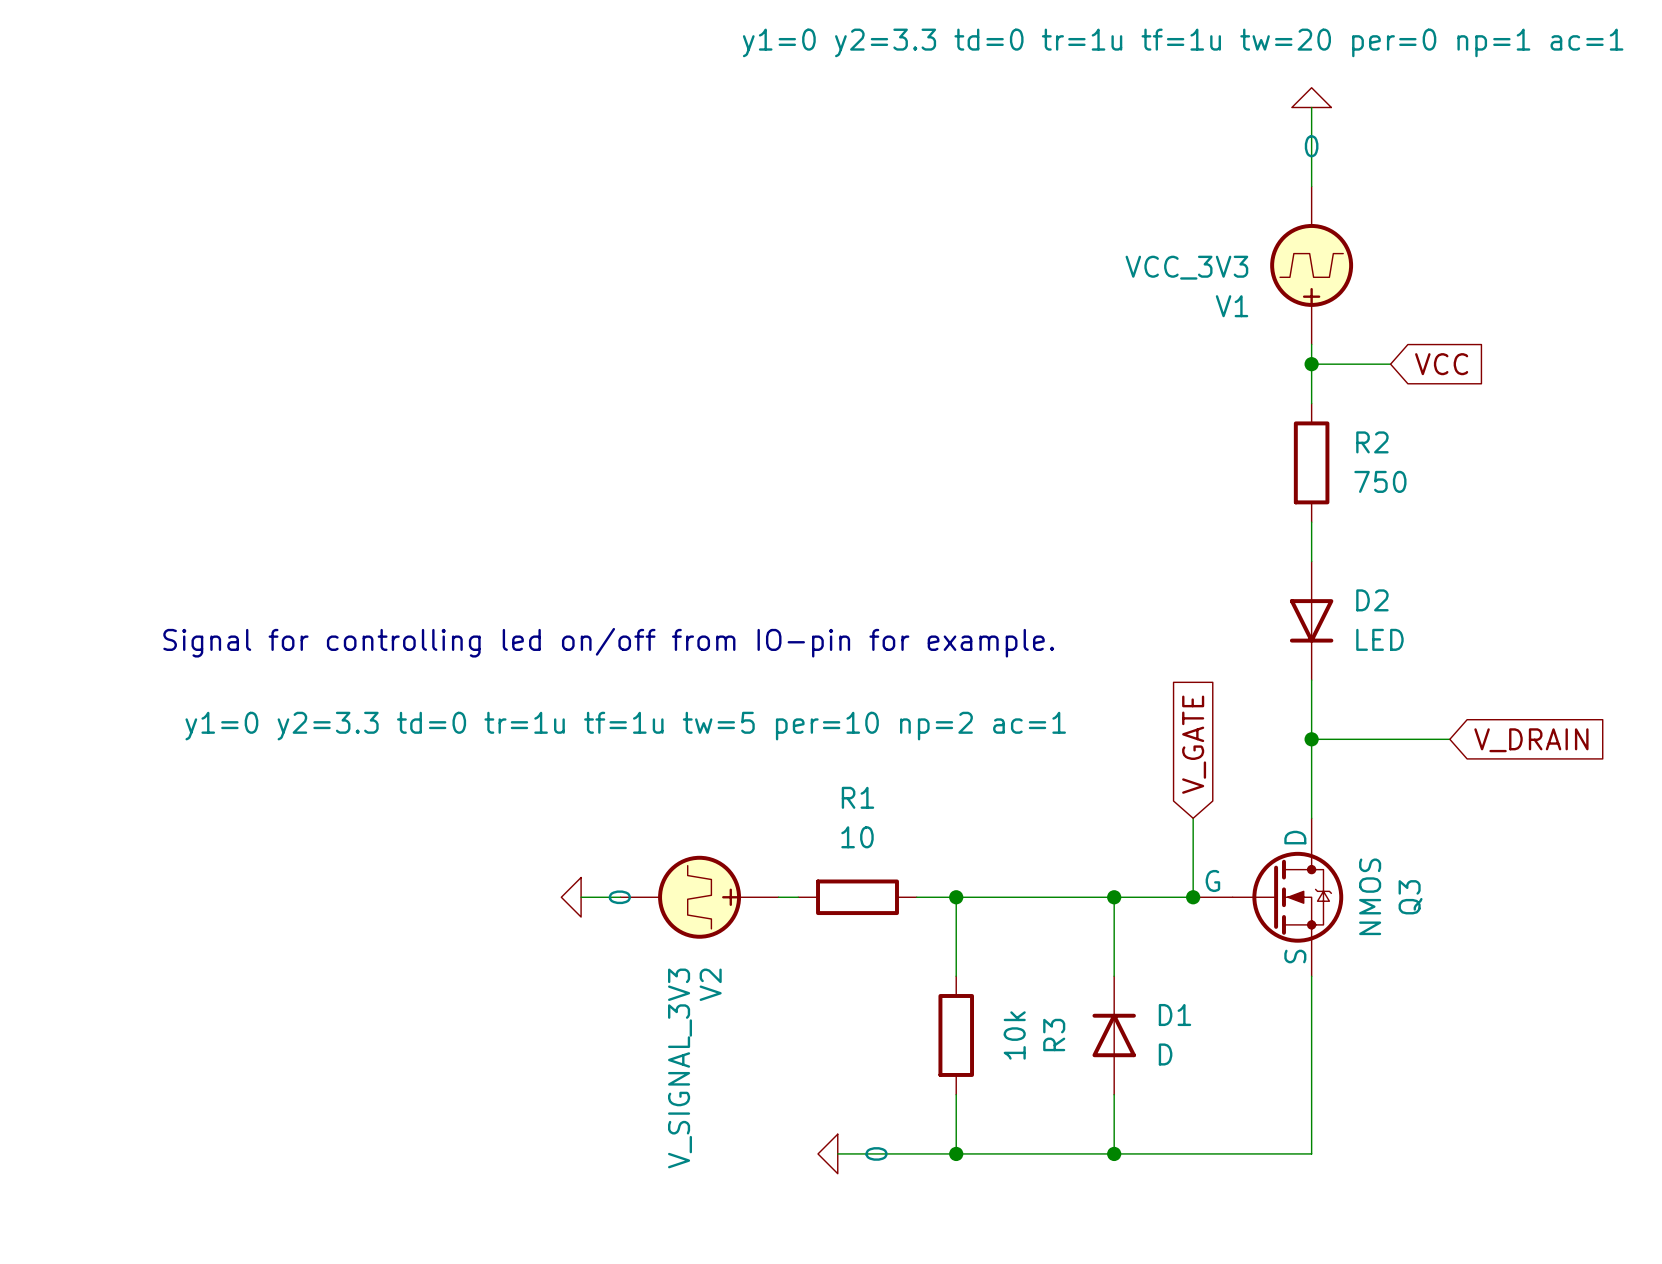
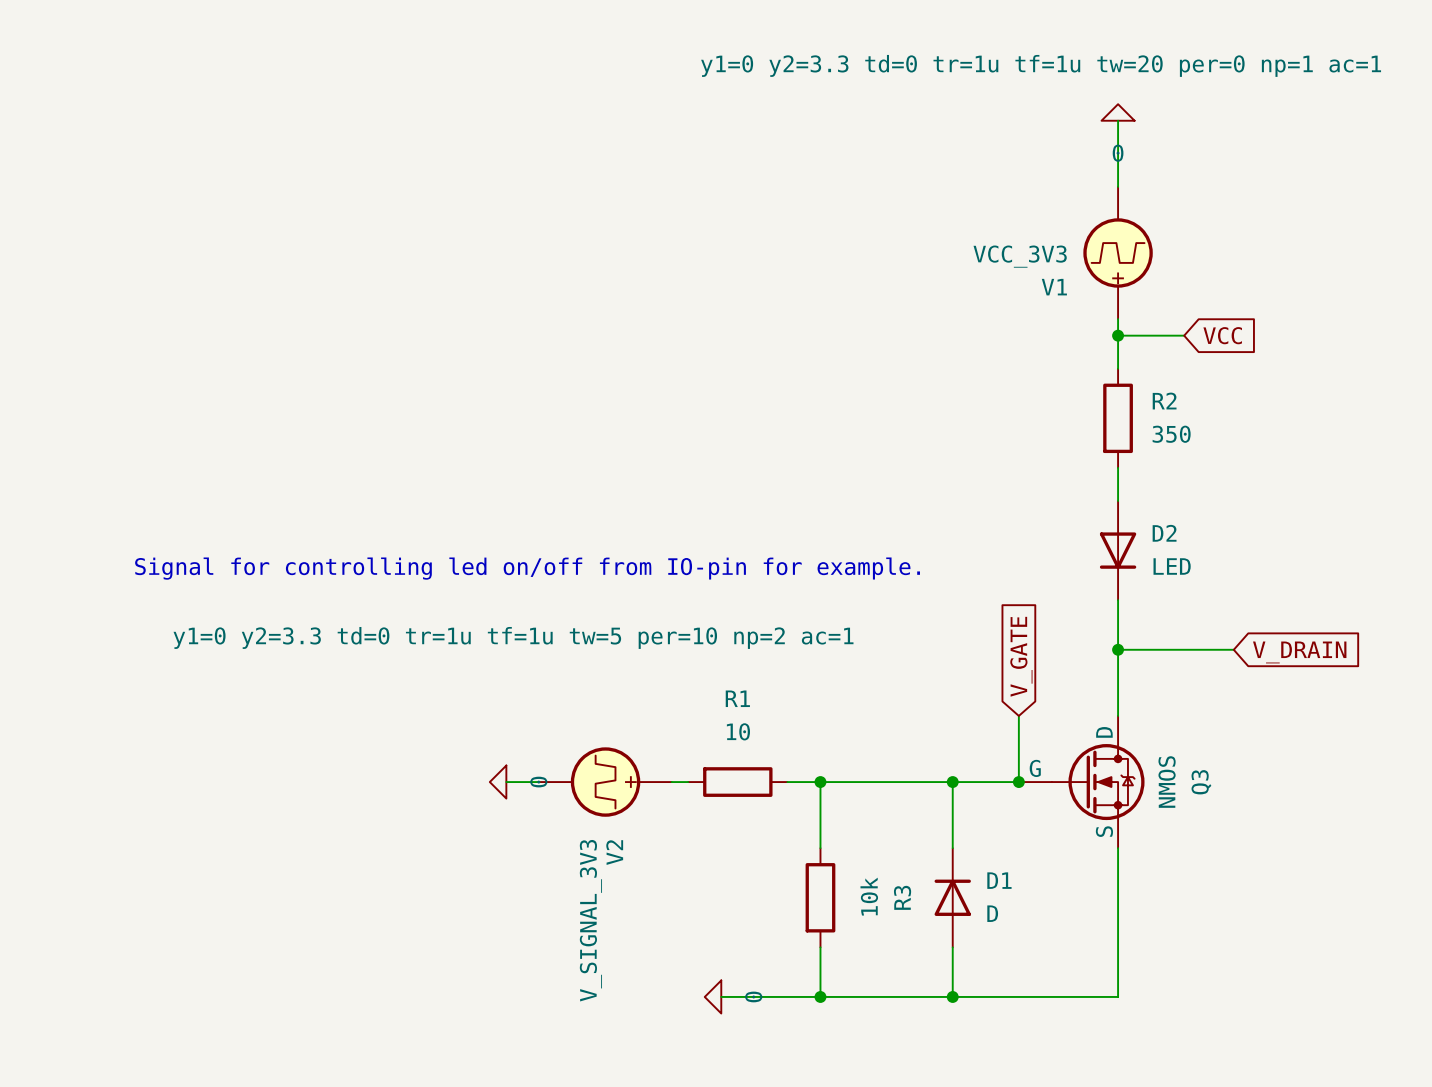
R2 value: 750 (1380, 481) -> 350 (1171, 434)

